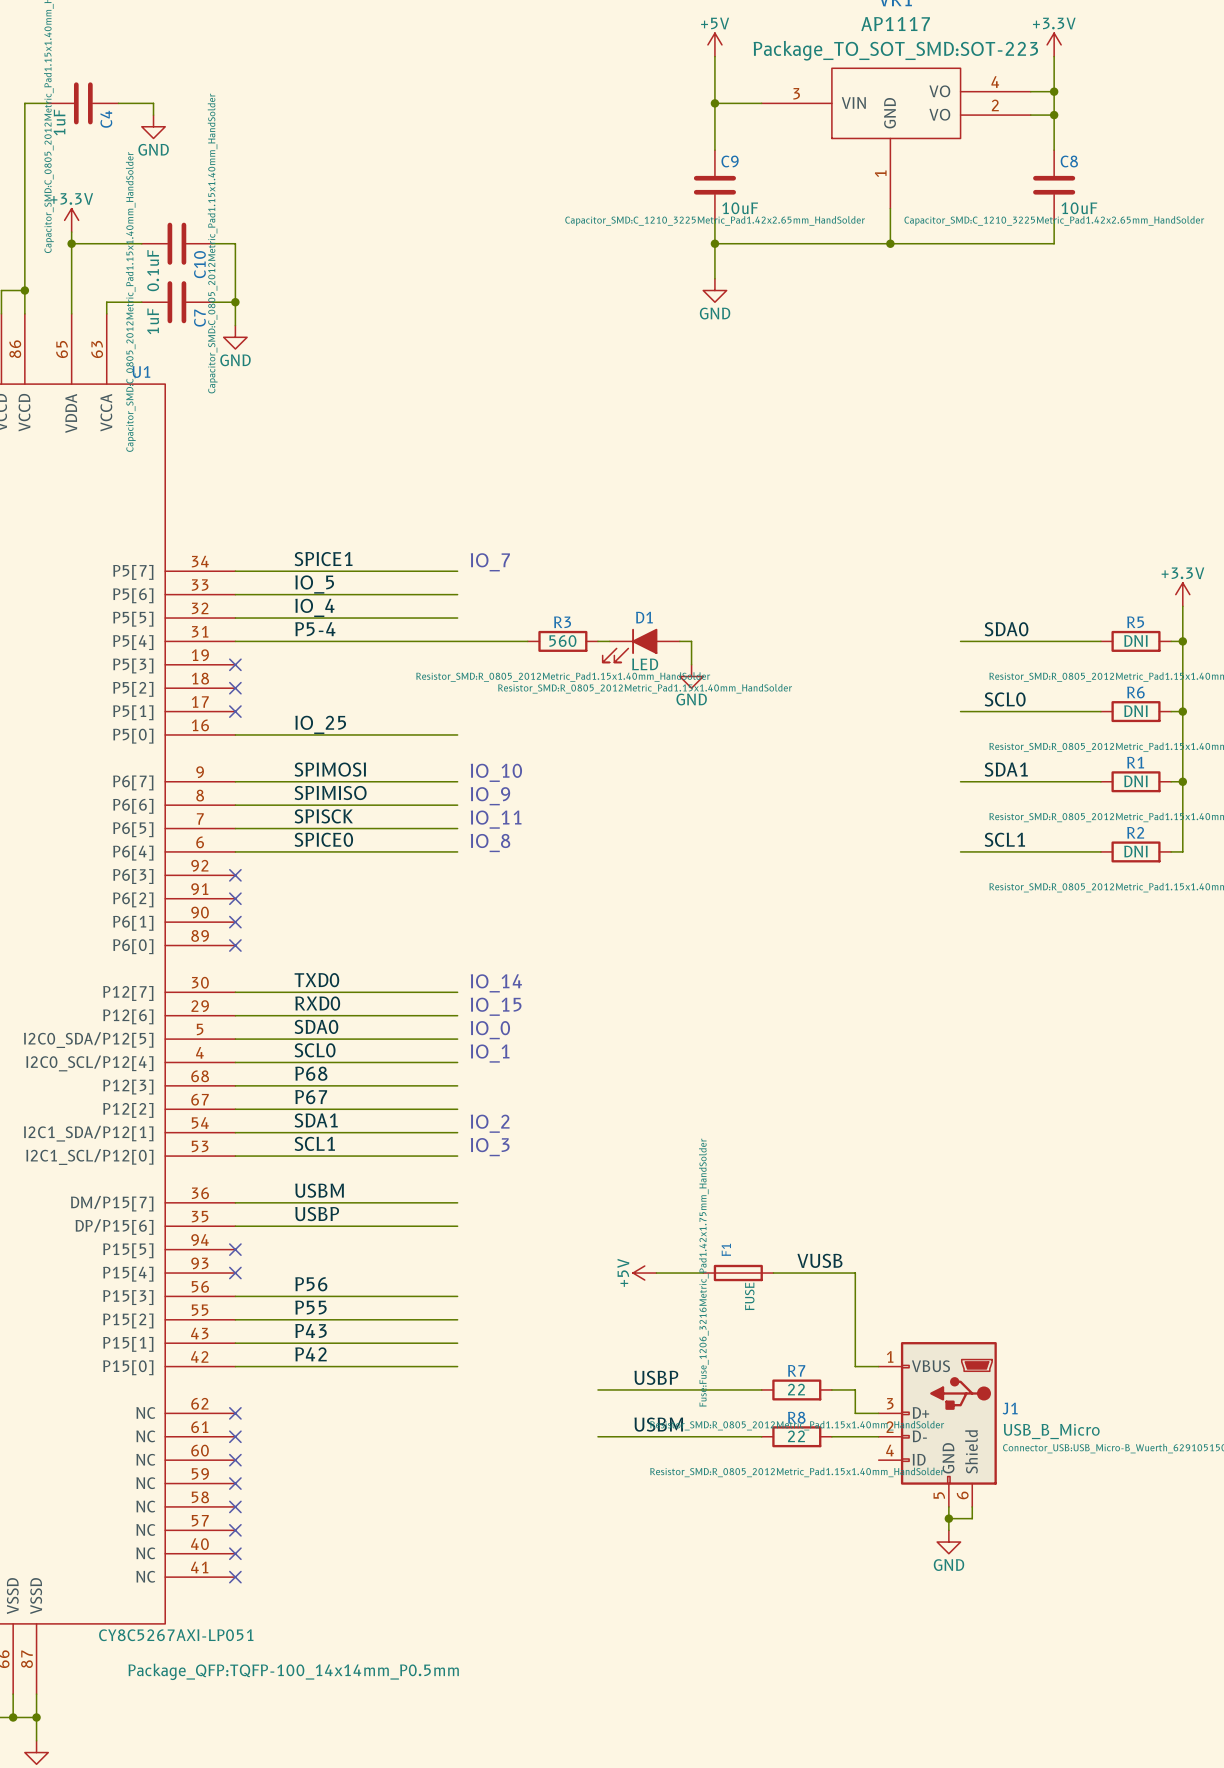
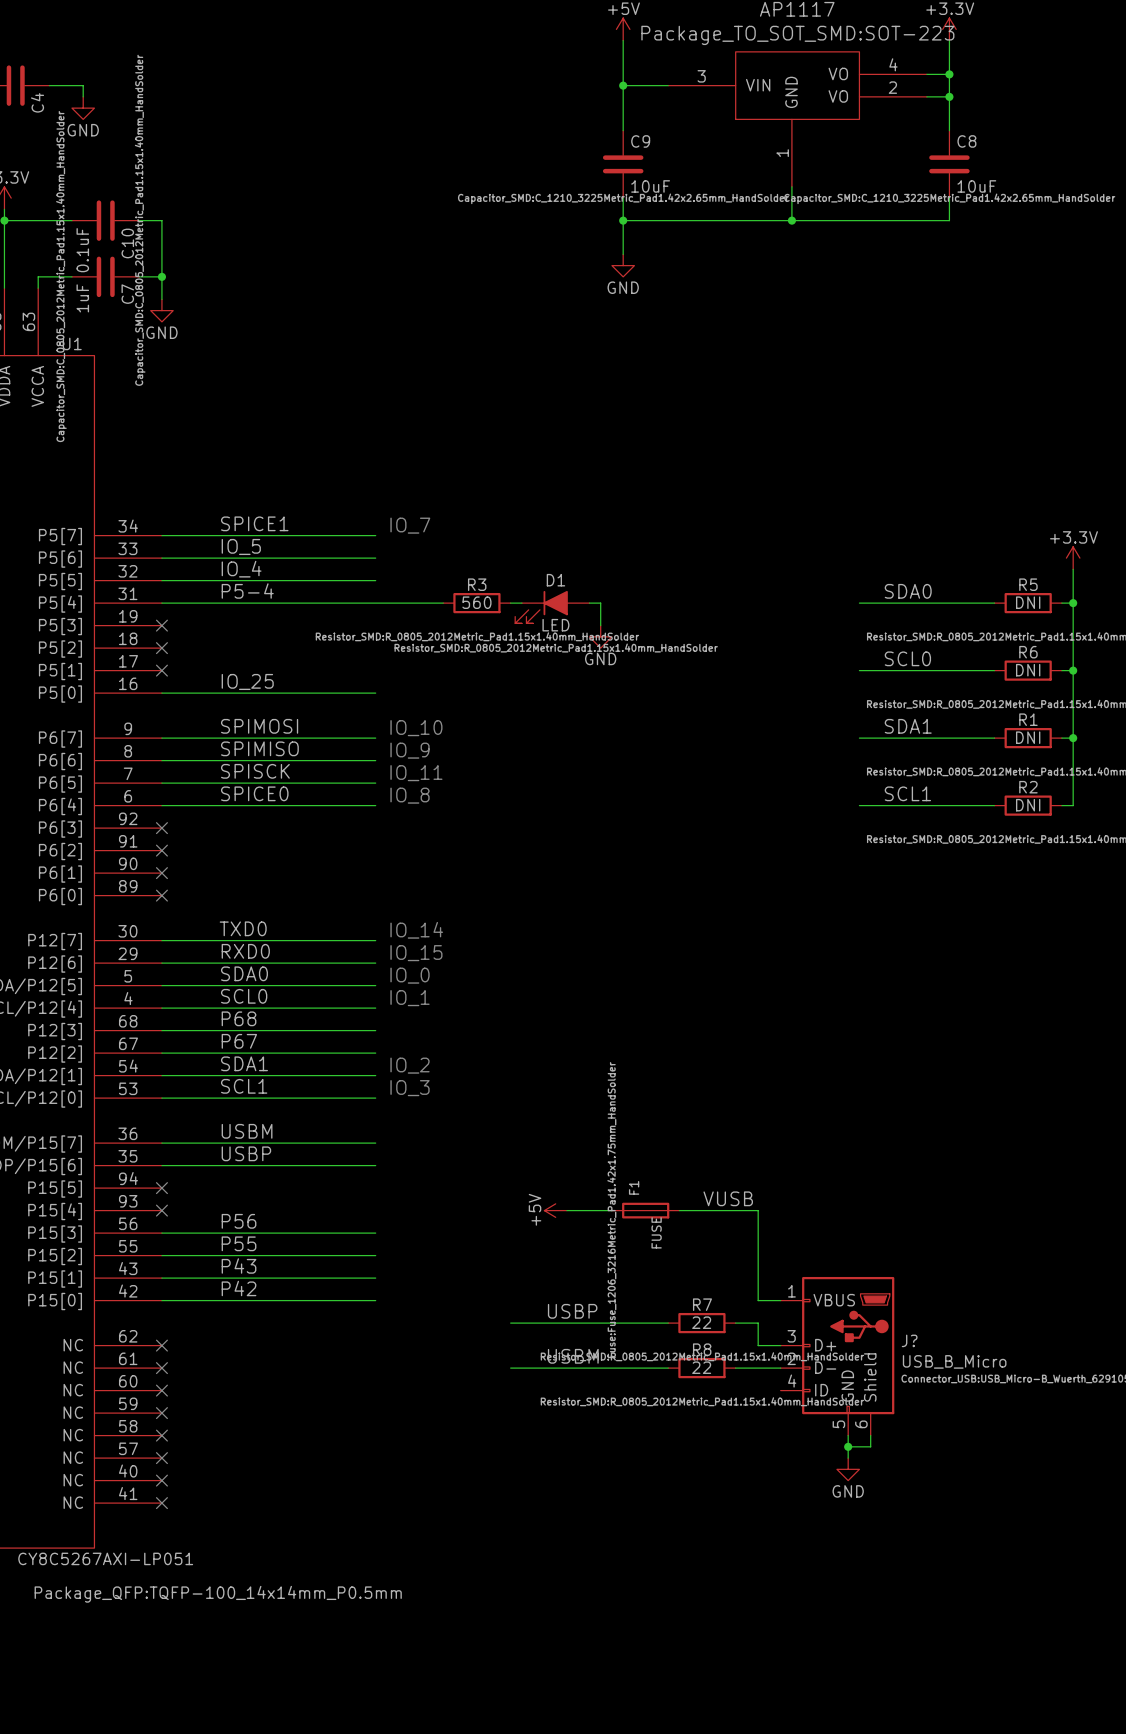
J1 name: J1 (1010, 1408) -> J? (909, 1340)

